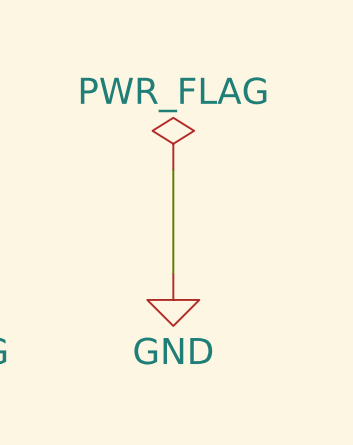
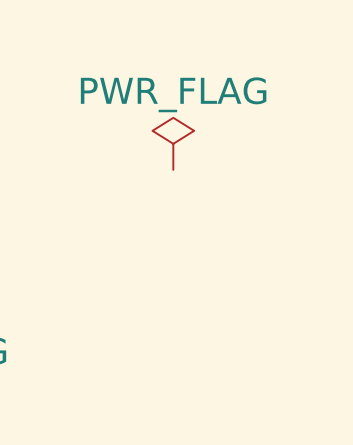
wire: (173, 169) (173, 273) -> none
power symbol: GND (173, 299) -> none

